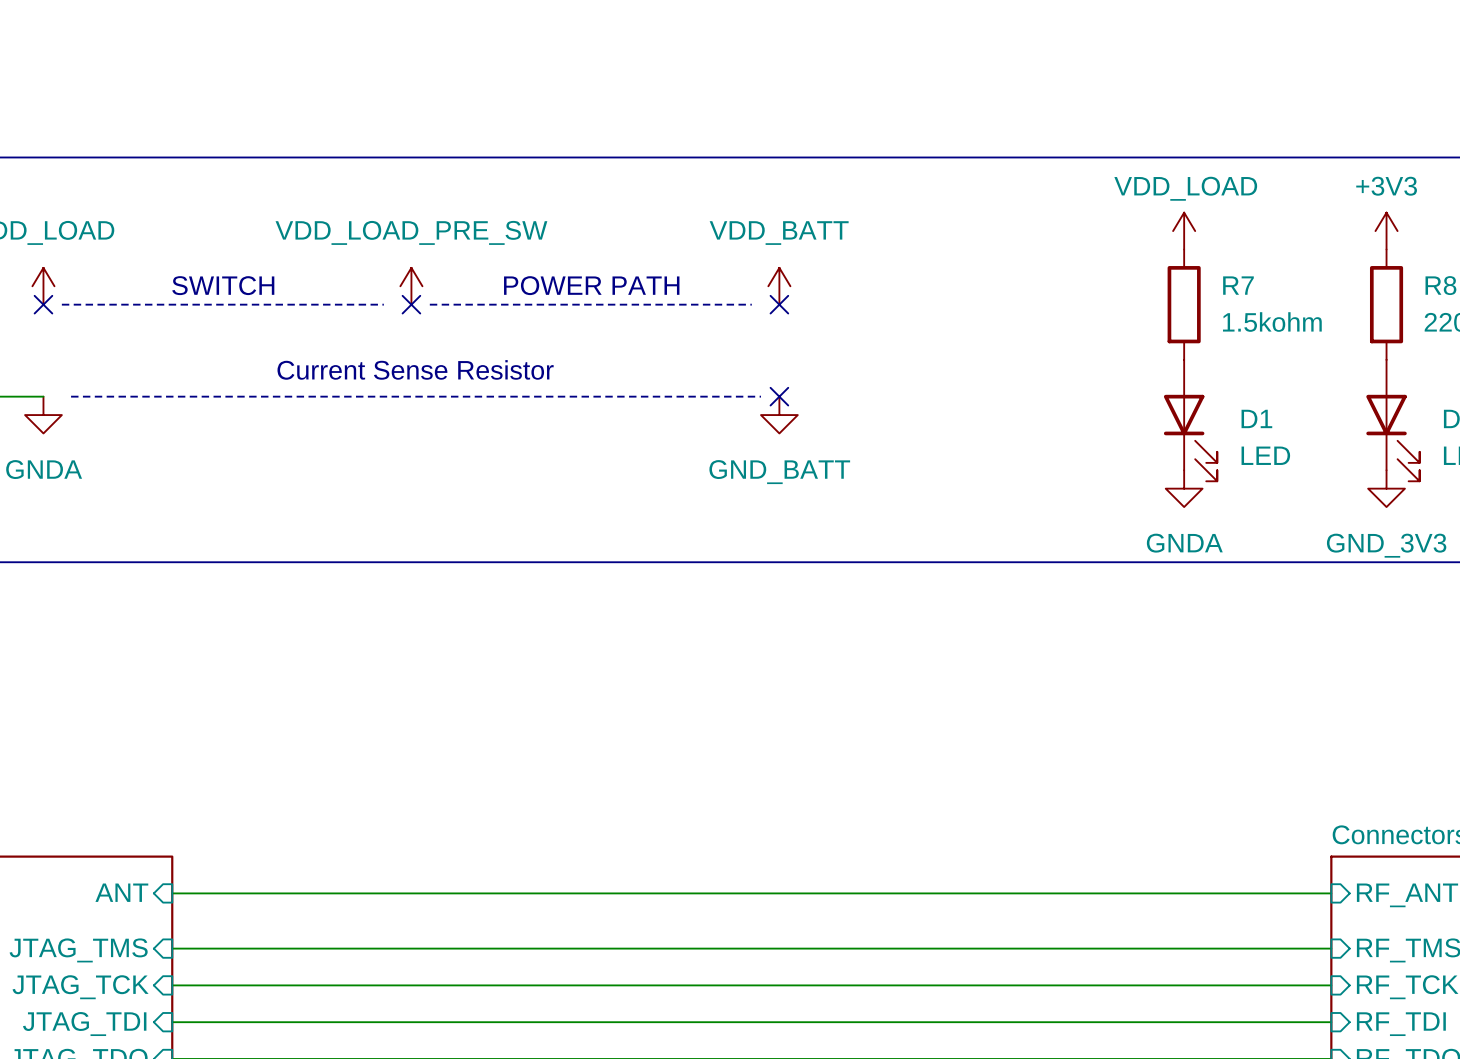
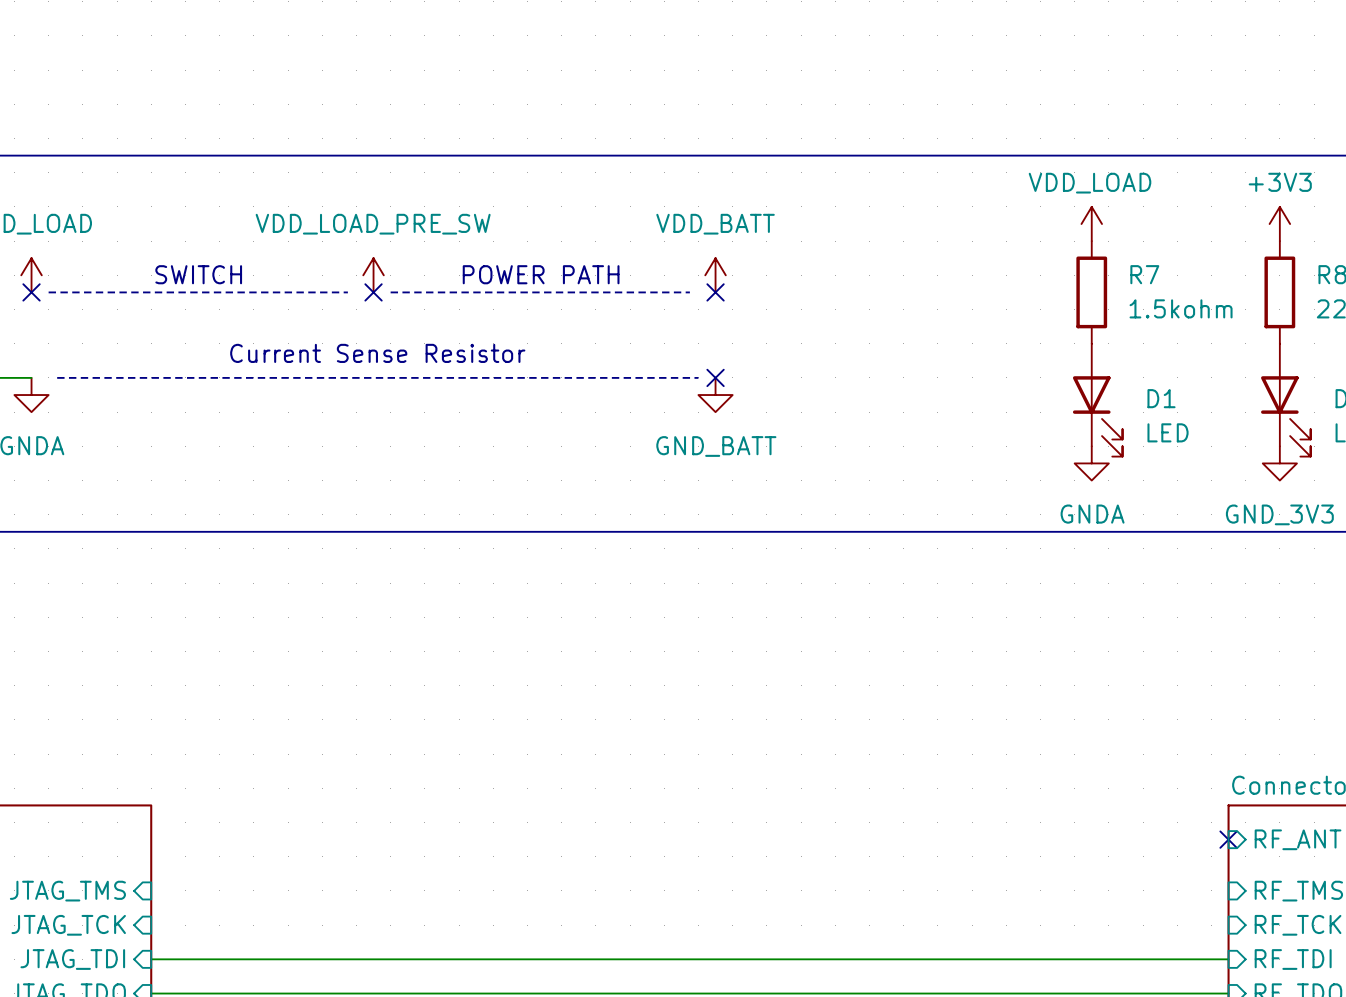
sheet pin: ANT (121, 892) -> none
wire: (172, 893) (1331, 893) -> none
no-connect mark: none -> (1228, 839)
wire: (172, 948) (1331, 948) -> none
wire: (172, 985) (1331, 985) -> none

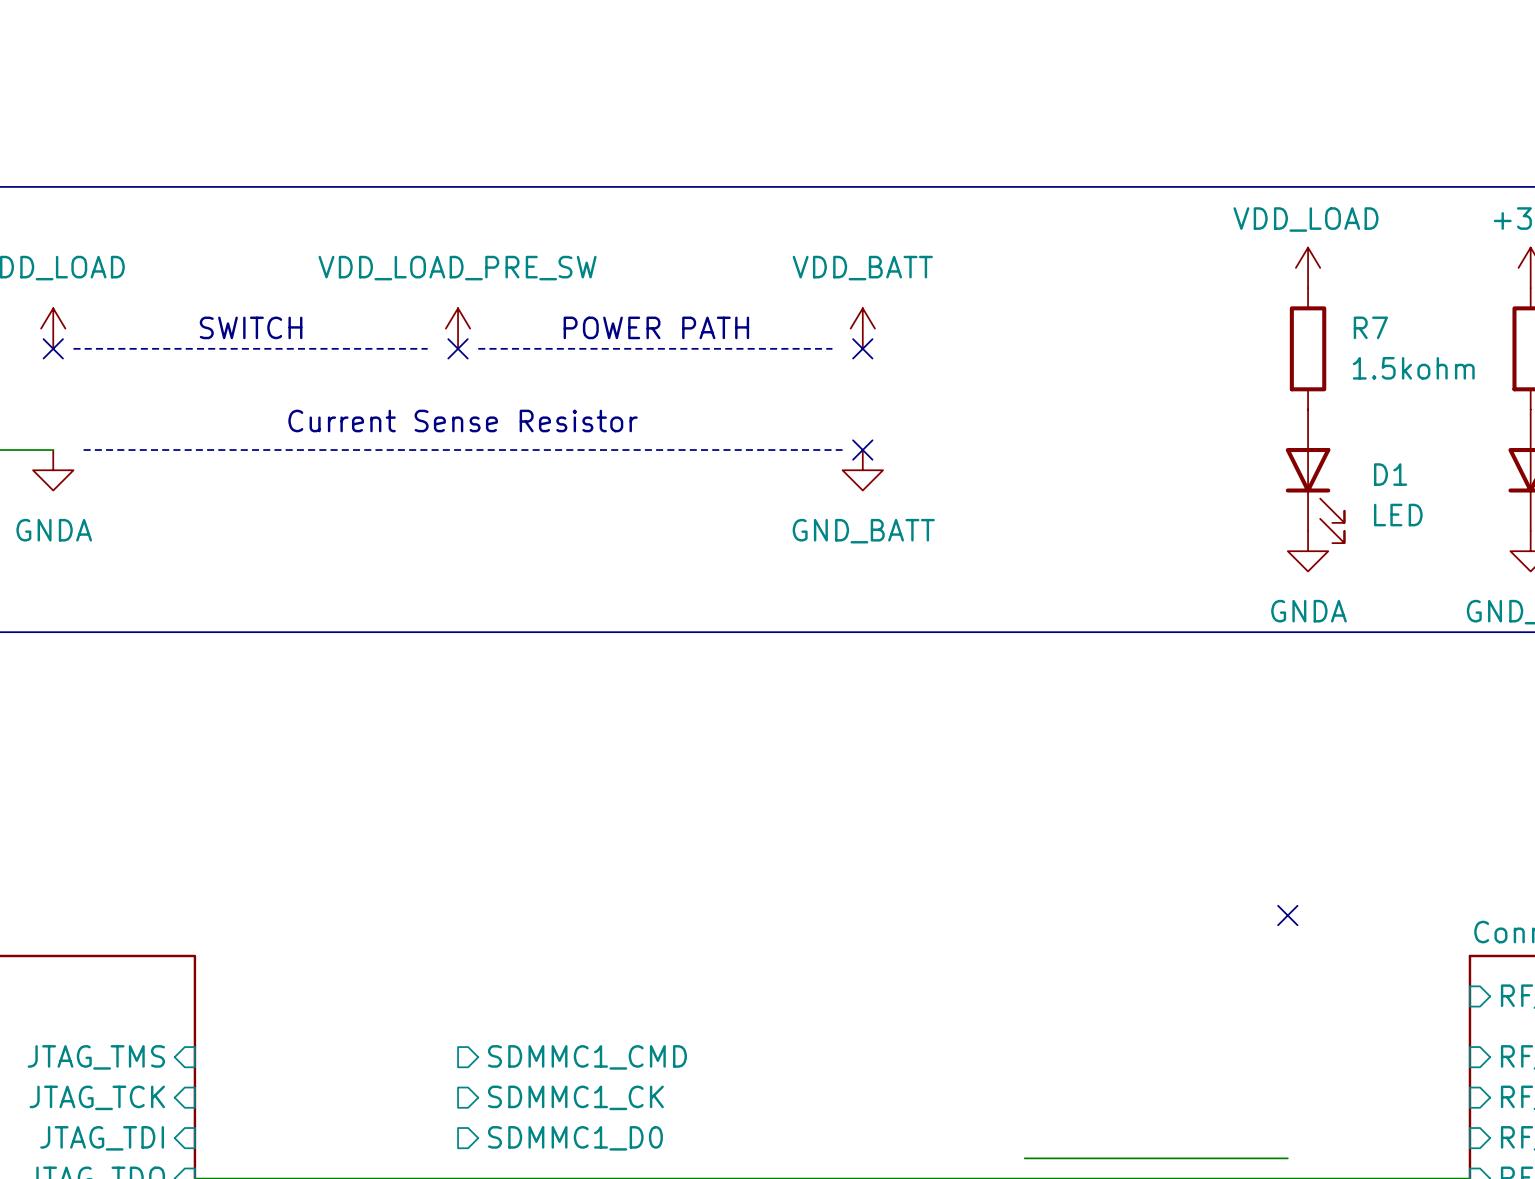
no-connect mark: none -> (1287, 915)
no-connect mark: (1228, 839) -> none
sheet pin: none -> SDMMC1_CMD (587, 1057)
sheet pin: none -> SDMMC1_CK (575, 1097)
wire: (151, 959) (1228, 959) -> none
sheet pin: none -> SDMMC1_D0 (575, 1138)
wire: none -> (1024, 1158) (1287, 1158)

